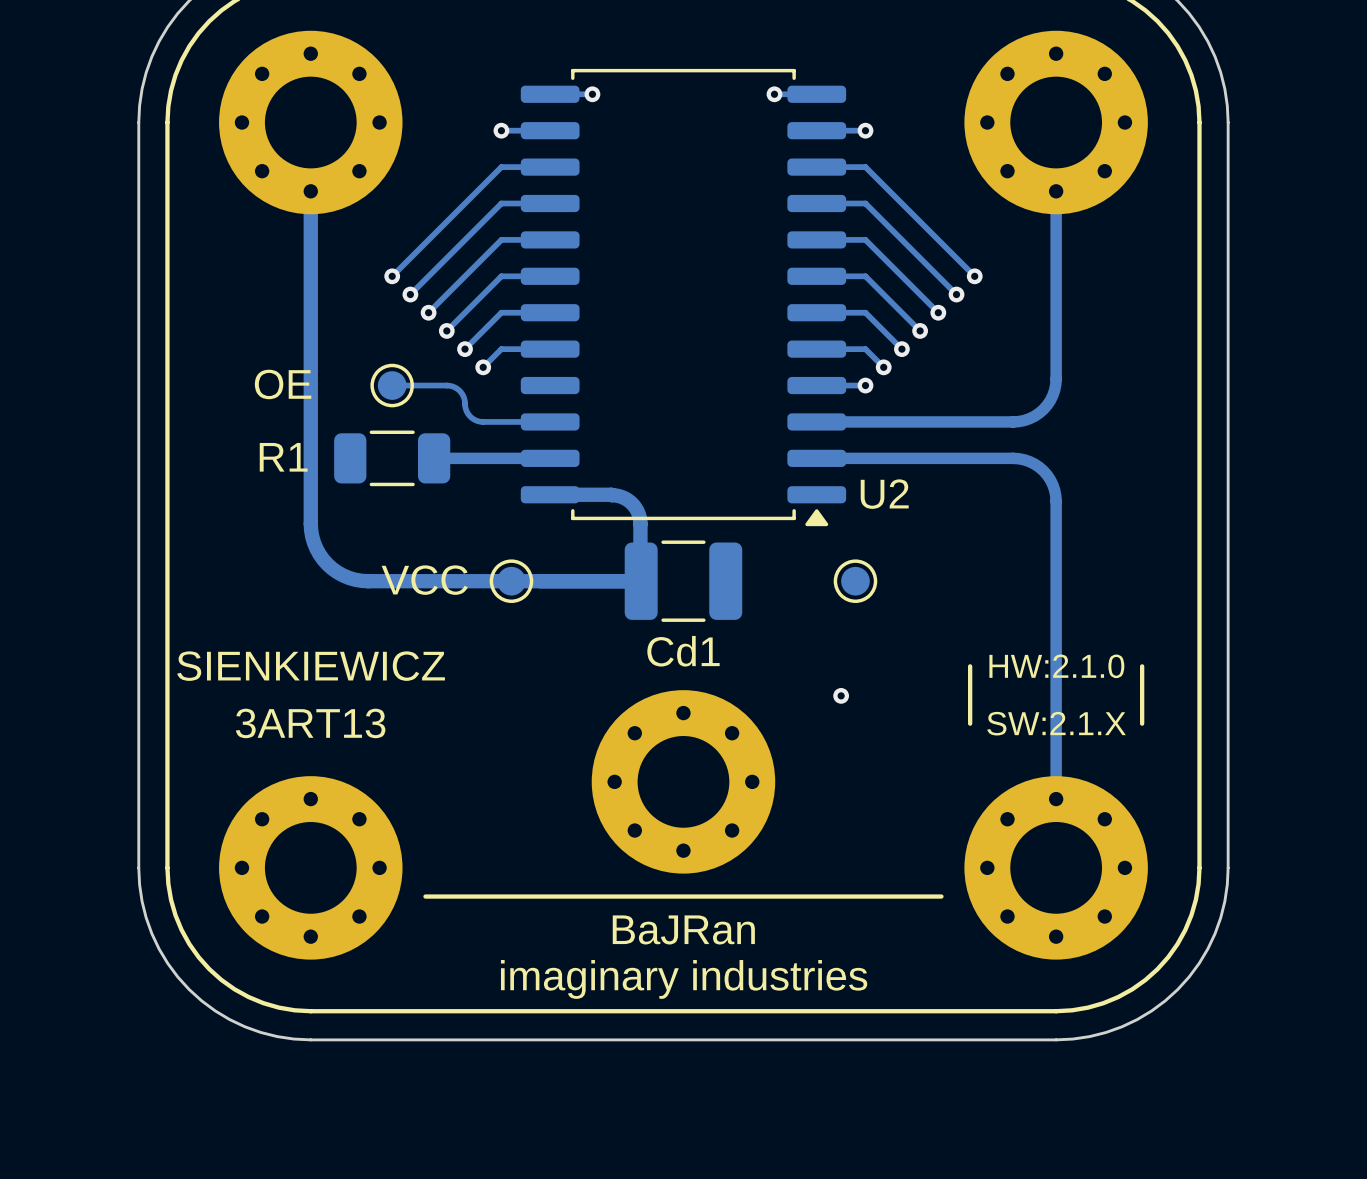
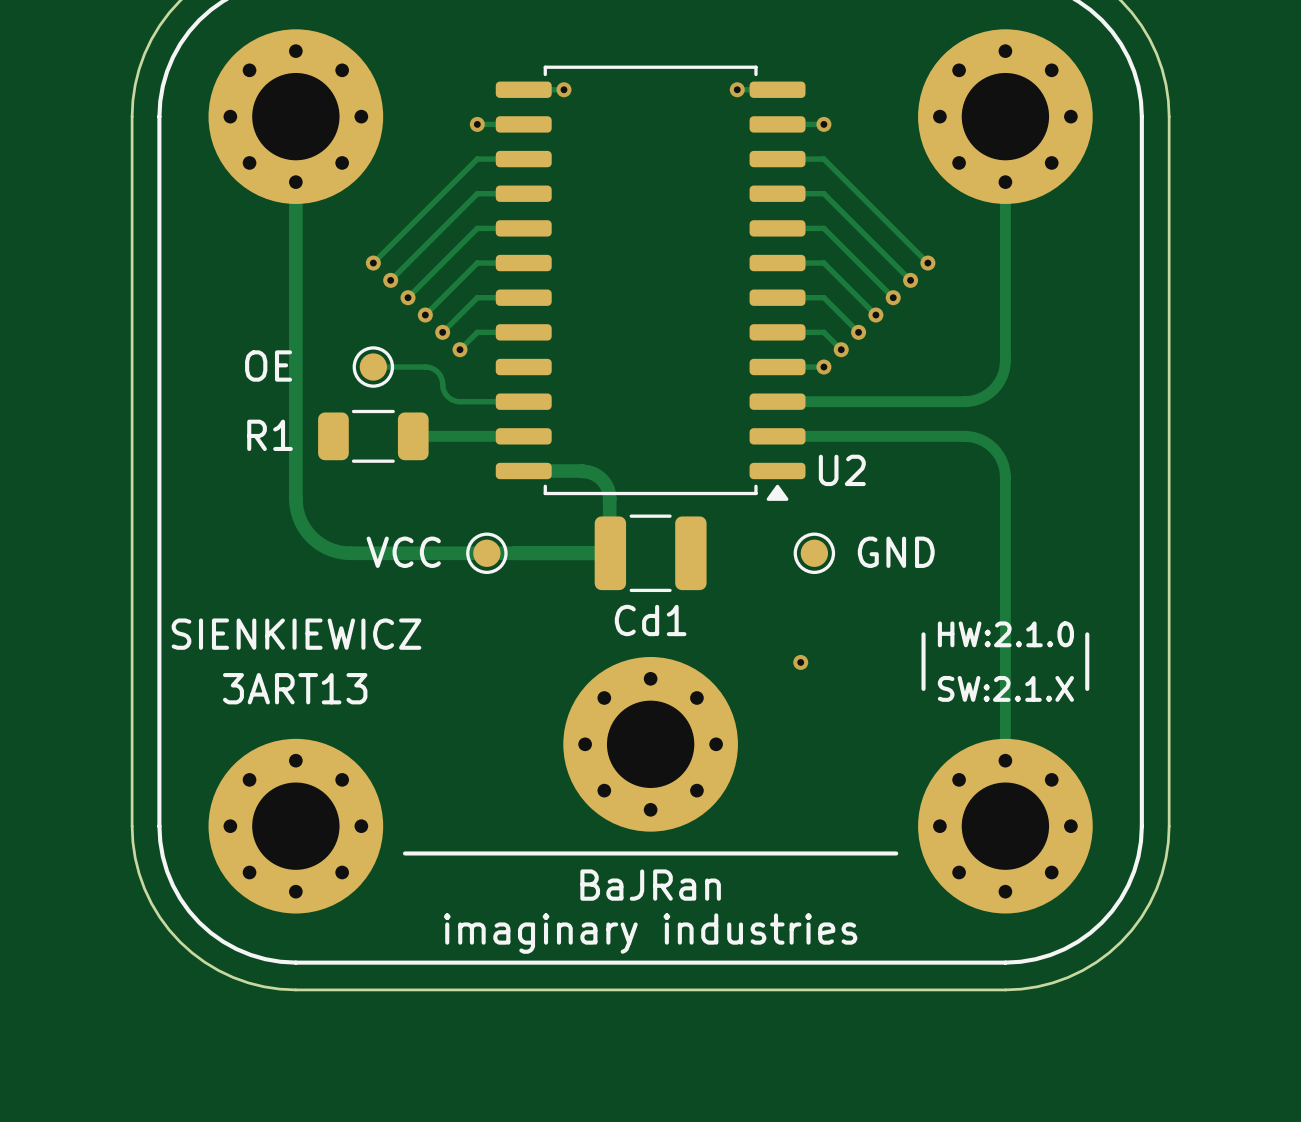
OE name: none -> OE (268, 366)
OE value: OE (283, 384) -> none
GND name: none -> GND (896, 552)

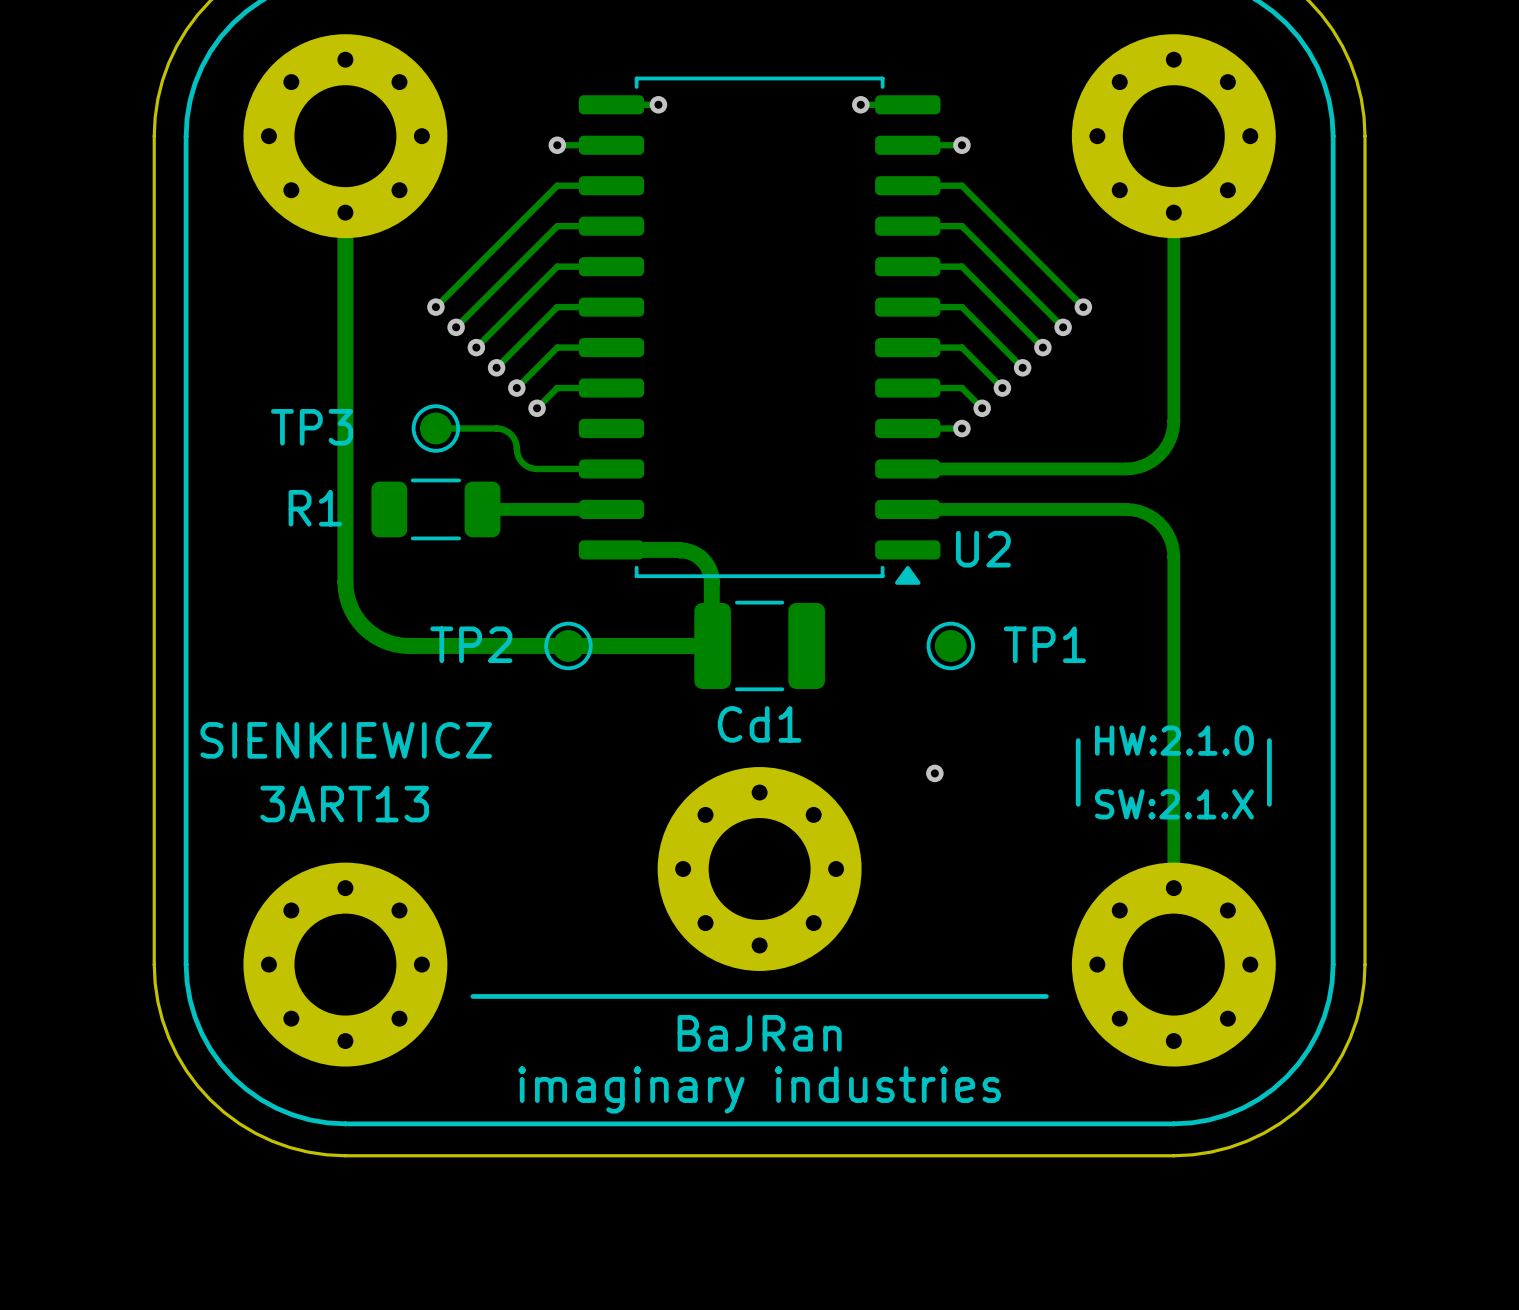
OE name: OE (268, 366) -> TP3 (312, 427)
VCC name: VCC (403, 552) -> TP2 (471, 644)
GND name: GND (896, 552) -> TP1 (1044, 644)

